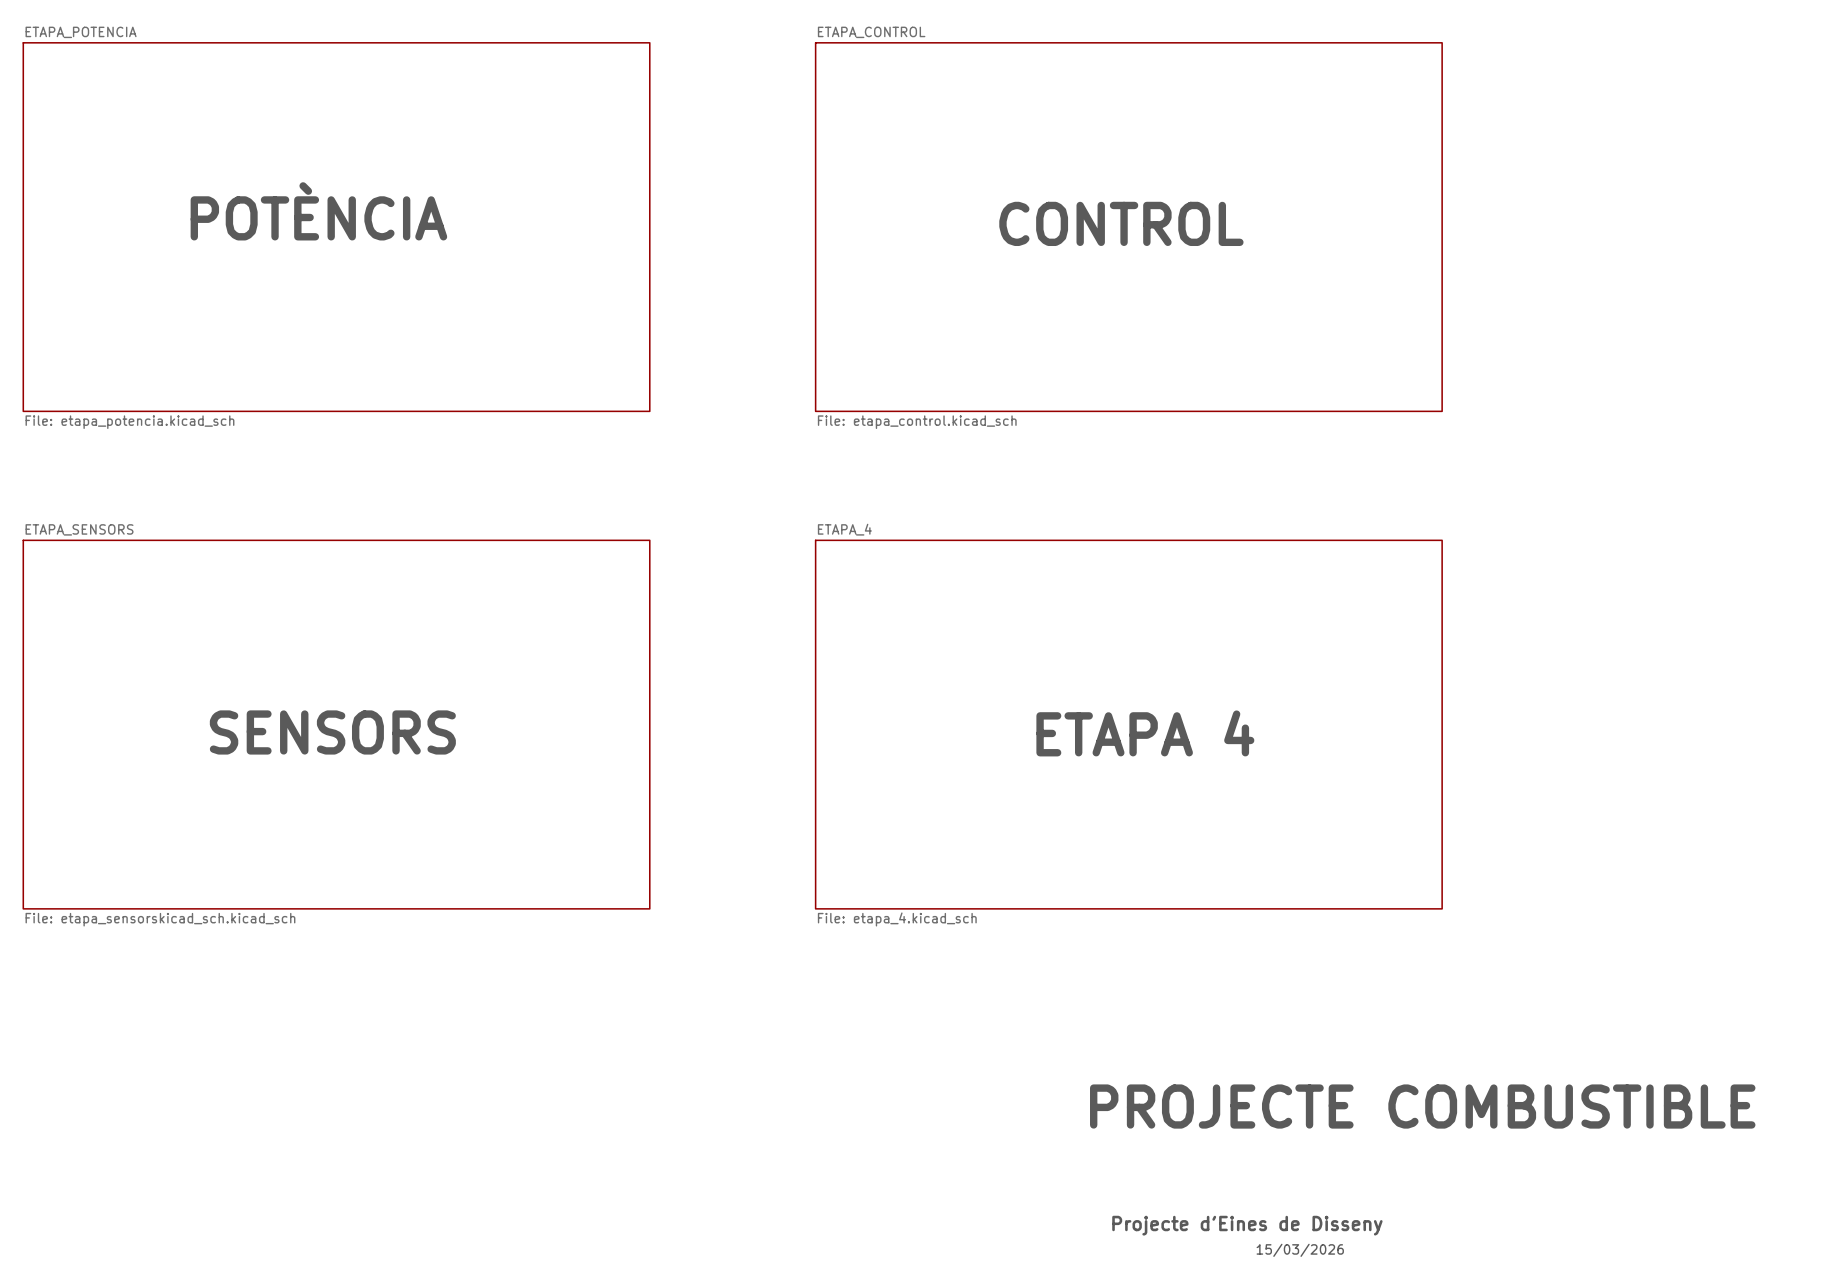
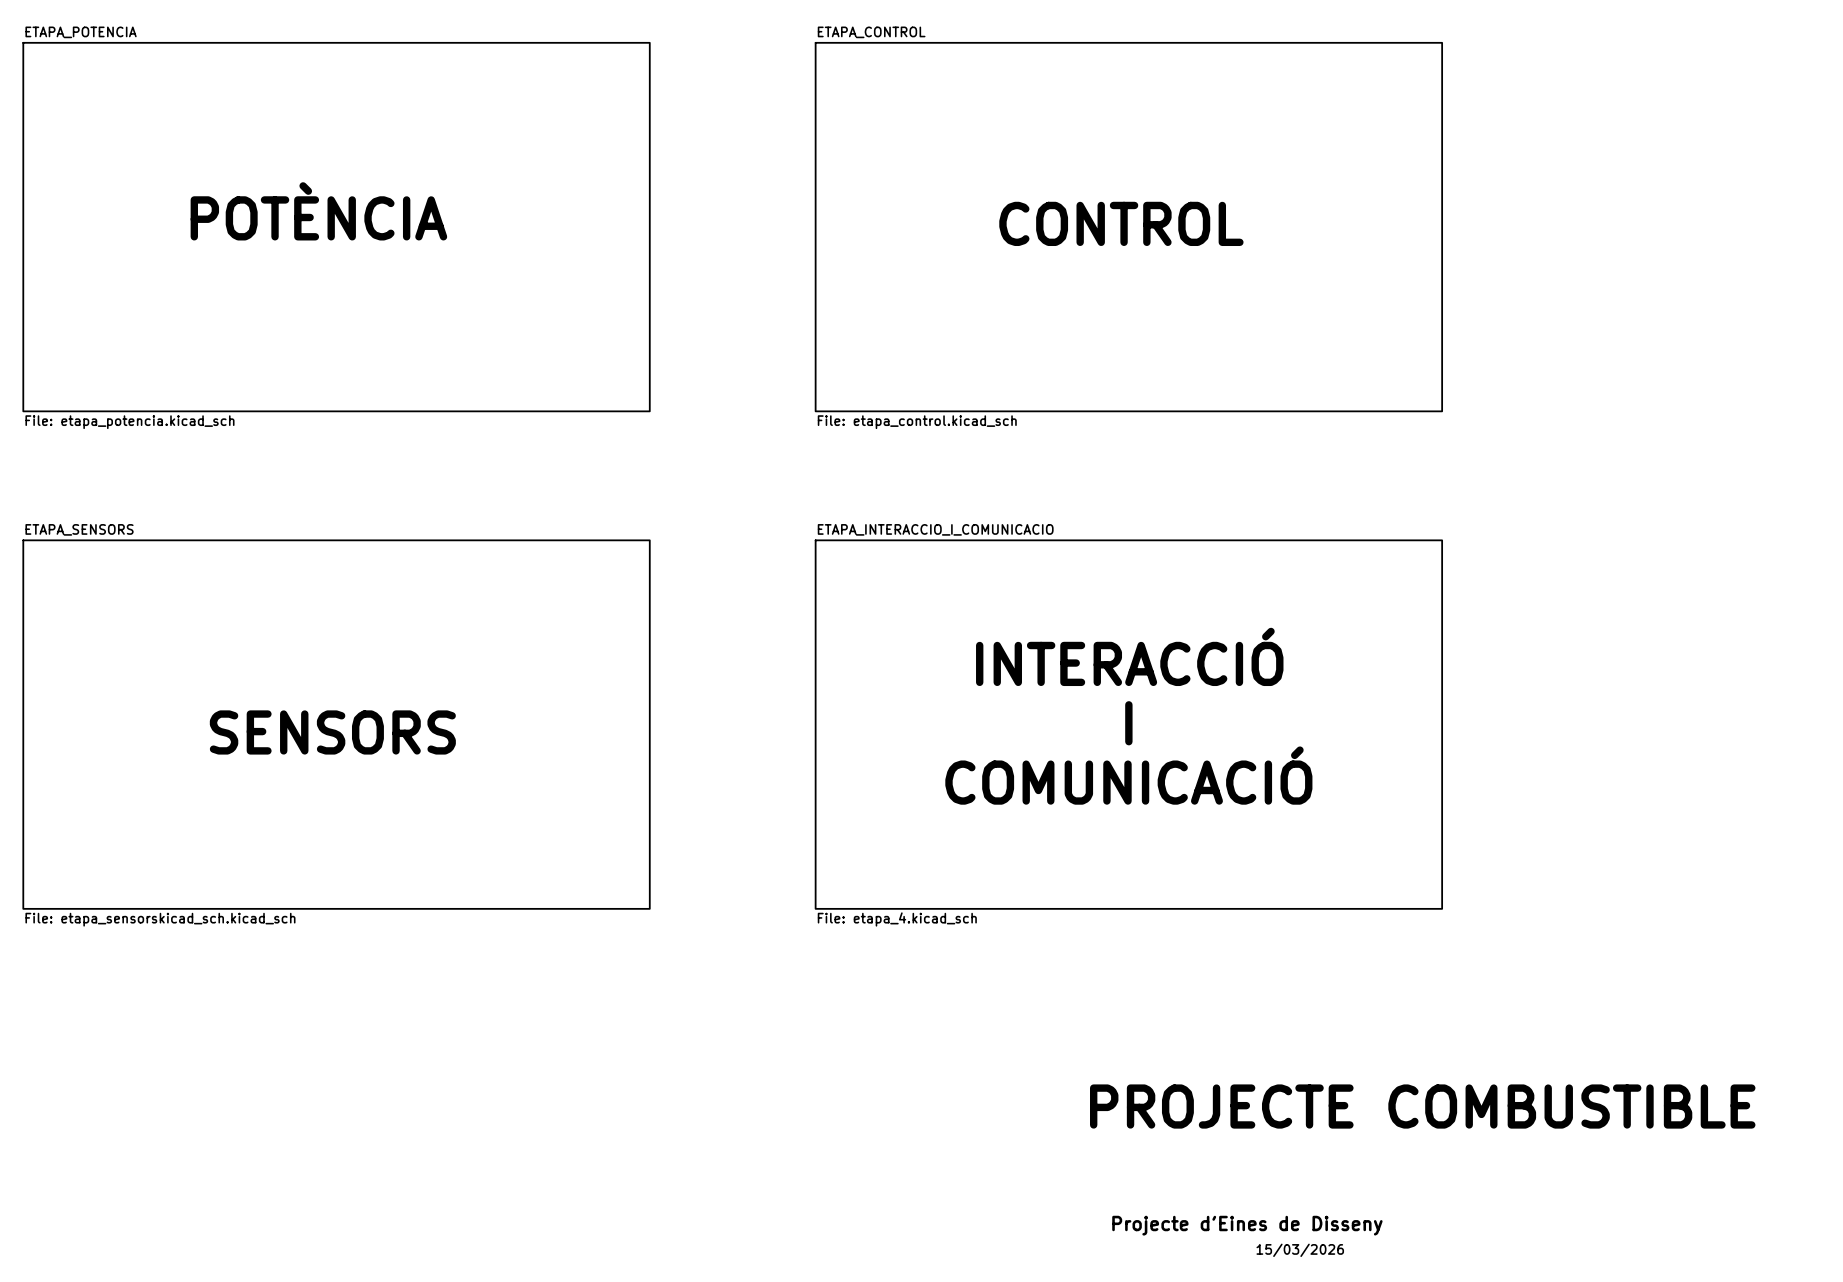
sheet ETAPA_4 name: ETAPA_4 (844, 529) -> ETAPA_INTERACCIO_I_COMUNICACIO (935, 529)
text: none -> INTERACCIÓ (1129, 656)
text: none -> I (1128, 723)
text: ETAPA 4 (1145, 733) -> none
text: none -> COMUNICACIÓ (1128, 775)

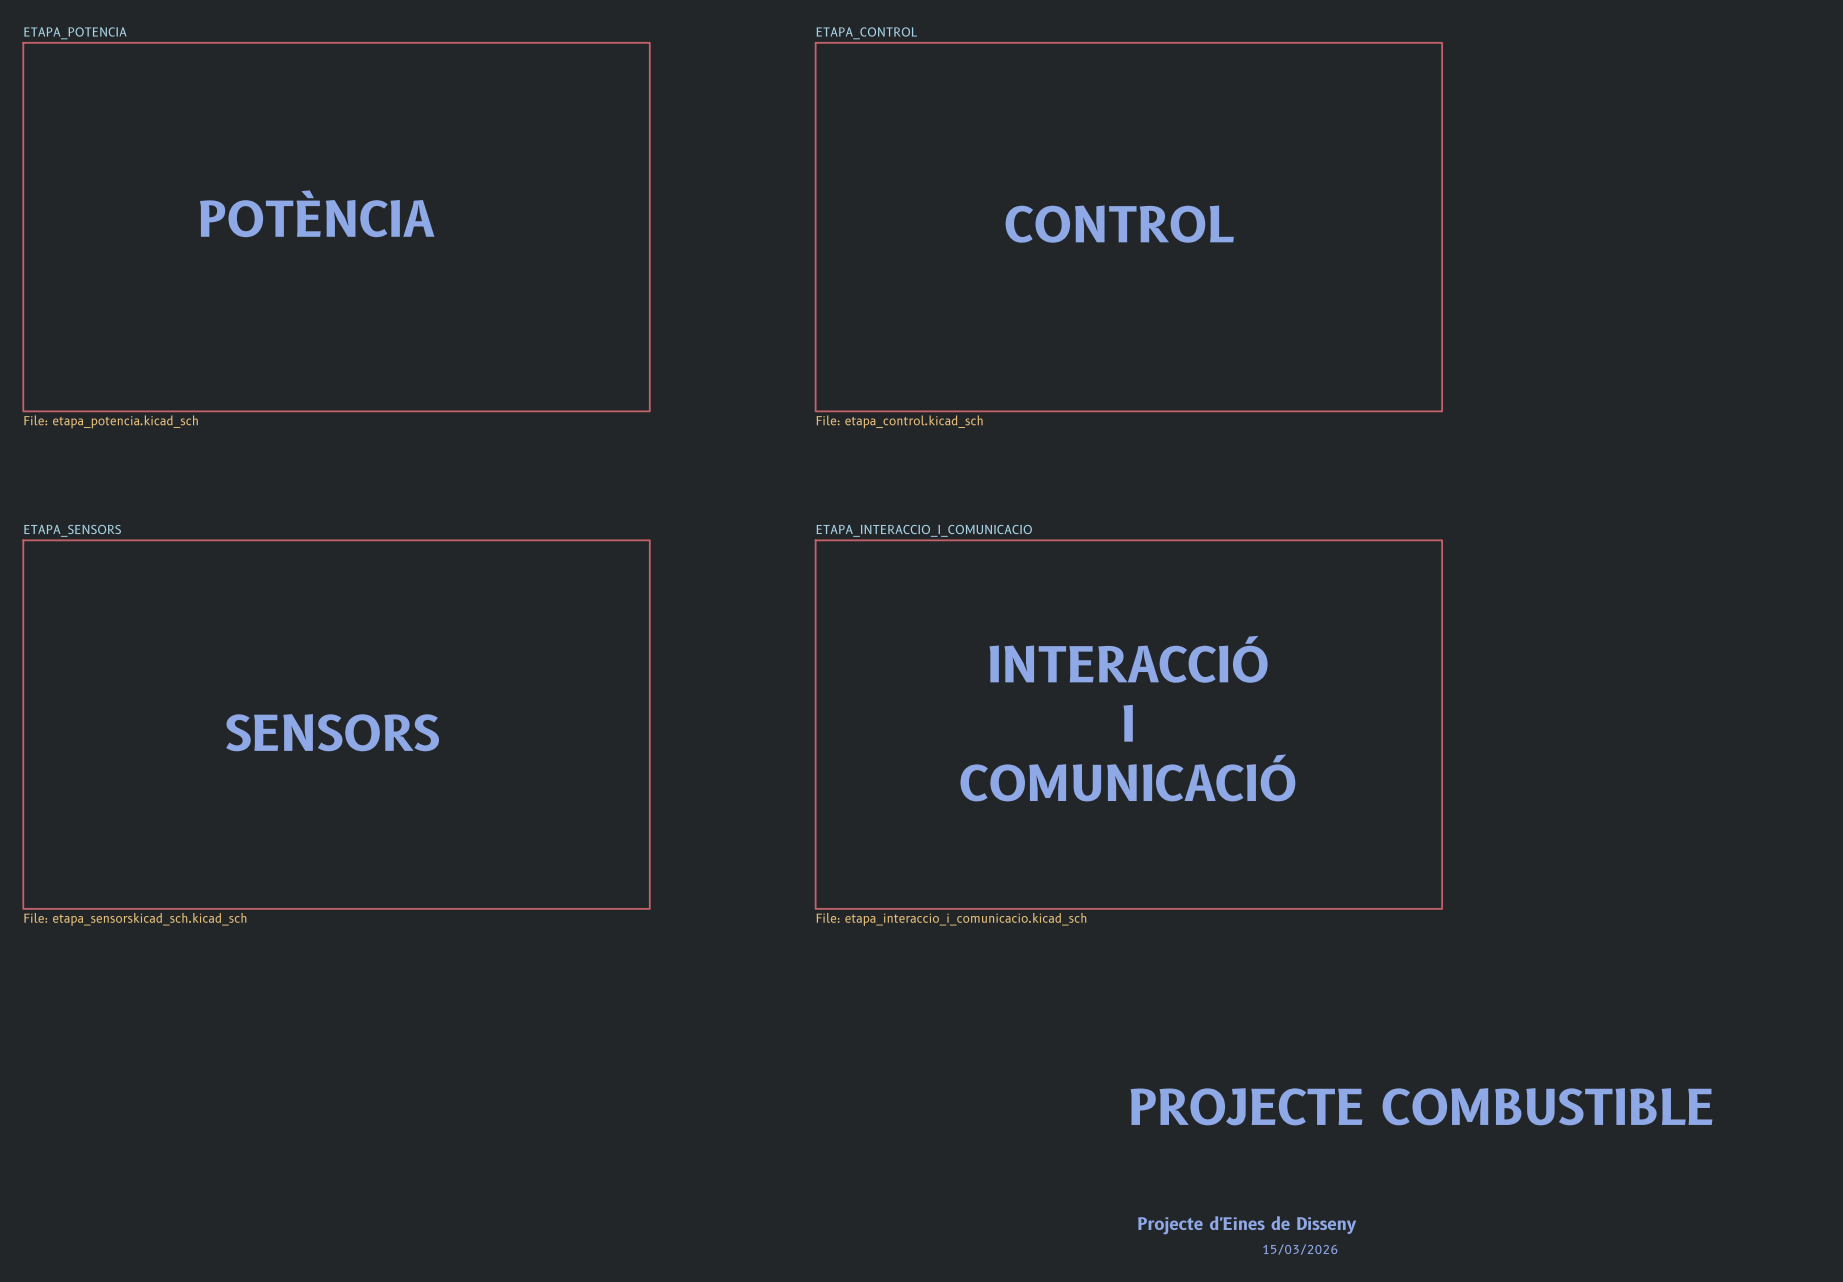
sheet ETAPA_INTERACCIO_I_COMUNICACIO value: File: etapa_4.kicad_sch (897, 919) -> File: etapa_interaccio_i_comunicacio.kicad_sch (951, 919)

